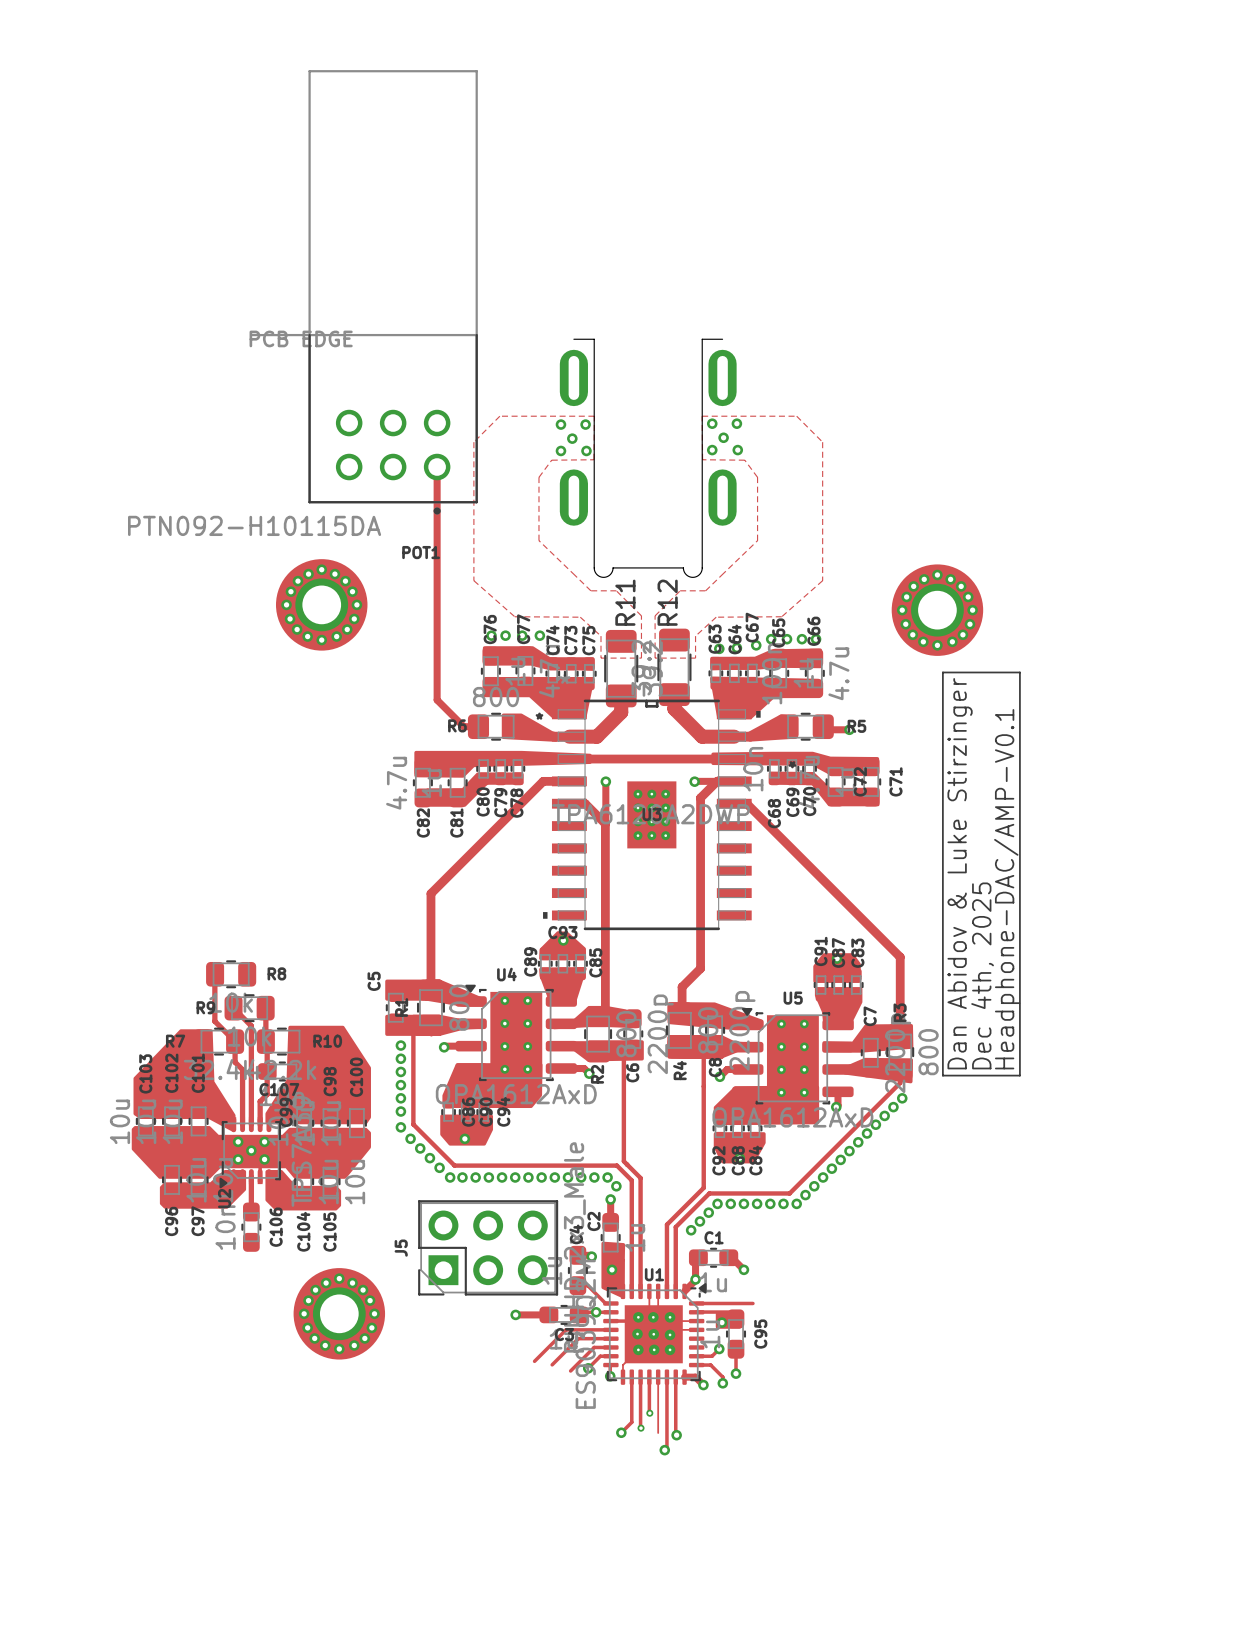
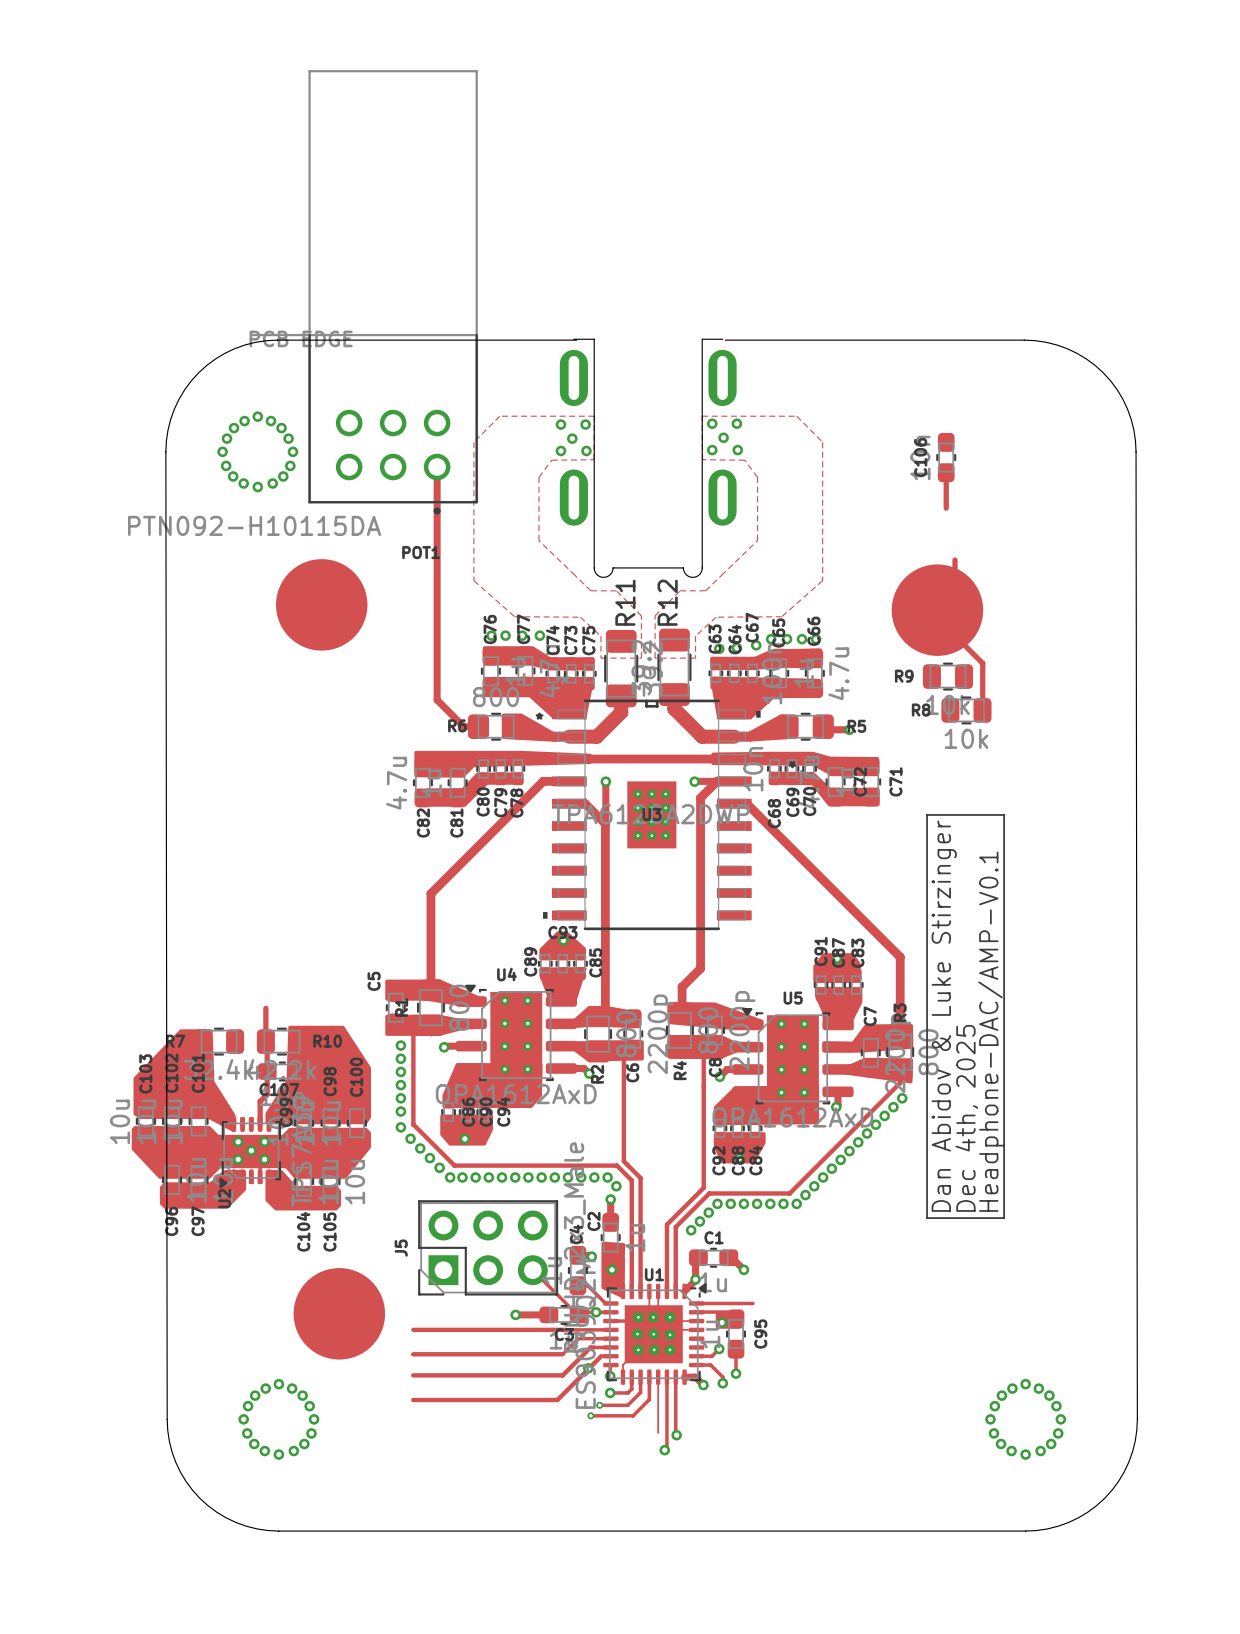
board edge: none -> (576, 340) (277, 340) (255, 342) (224, 353) (206, 365) (184, 389) (170, 419) (165, 451) (167, 1419) (169, 1441) (175, 1462) (192, 1490) (216, 1512) (246, 1526) (267, 1530) (1025, 1531) (1058, 1526) (1087, 1512) (1112, 1490) (1128, 1462) (1136, 1430) (1136, 451) (1131, 419) (1117, 389) (1095, 365) (1076, 353) (1046, 342) (1024, 340) (725, 340)
via: none -> (257, 416)
via: none -> (244, 421)
via: none -> (270, 421)
via: none -> (234, 428)
via: none -> (281, 428)
via: none -> (227, 438)
via: none -> (288, 438)
via: none -> (222, 451)
via: none -> (292, 451)
via: none -> (226, 465)
via: none -> (290, 465)
track: none -> (946, 472) (946, 508)
via: none -> (233, 476)
via: none -> (283, 476)
via: none -> (243, 483)
via: none -> (272, 483)
via: none -> (257, 487)
track: none -> (955, 560) (955, 615) (962, 622) (962, 643) (982, 663) (982, 709)
via: (321, 569) -> none
via: (308, 574) -> none
via: (334, 574) -> none
via: (937, 574) -> none
via: (924, 579) -> none
via: (950, 579) -> none
via: (297, 581) -> none
via: (345, 581) -> none
via: (913, 586) -> none
via: (961, 586) -> none
via: (290, 591) -> none
via: (352, 591) -> none
via: (906, 596) -> none
via: (968, 596) -> none
via: (286, 604) -> none
via: (321, 604) -> none
via: (356, 604) -> none
via: (902, 610) -> none
via: (937, 610) -> none
via: (972, 610) -> none
via: (290, 618) -> none
via: (354, 618) -> none
via: (905, 624) -> none
via: (969, 624) -> none
via: (297, 629) -> none
via: (347, 629) -> none
via: (912, 634) -> none
via: (962, 634) -> none
via: (307, 636) -> none
via: (336, 636) -> none
via: (321, 640) -> none
via: (923, 641) -> none
via: (952, 641) -> none
via: (937, 645) -> none
line: (942, 672) (1019, 672) (1019, 1075) (942, 1075) (942, 672) -> (927, 814) (1004, 814) (1004, 1218) (927, 1218) (927, 814)
text position: Dan Abidov & Luke Stirzinger (960, 873) -> Dan Abidov & Luke Stirzinger (944, 1016)
text position: Headphone-DAC/AMP-V0.1 (1007, 889) -> Headphone-DAC/AMP-V0.1 (991, 1031)
R8 name position: R8 (276, 973) -> R8 (921, 710)
R8 position: (231, 974) -> (966, 710)
track: (214, 975) (214, 1021) (235, 1041) (235, 1062) (242, 1069) (242, 1124) -> none
text position: Dec 4th, 2025 (982, 975) -> Dec 4th, 2025 (966, 1118)
track: (233, 1008) (251, 1025) (251, 1124) -> none
R9 position: (249, 1008) -> (947, 676)
track: (251, 1176) (251, 1212) -> none
C106 position: (251, 1227) -> (946, 457)
C106 name position: C106 (276, 1227) -> C106 (920, 457)
track: none -> (532, 1270) (579, 1314)
via: (339, 1278) -> none
via: (326, 1283) -> none
via: (352, 1283) -> none
via: (315, 1290) -> none
via: (363, 1290) -> none
via: (308, 1300) -> none
via: (370, 1300) -> none
via: (304, 1313) -> none
via: (339, 1313) -> none
via: (374, 1313) -> none
via: (307, 1327) -> none
via: (371, 1327) -> none
track: (566, 1329) (534, 1361) -> (566, 1329) (413, 1329)
via: (314, 1338) -> none
via: (364, 1338) -> none
via: (325, 1345) -> none
via: (354, 1345) -> none
track: (594, 1347) (570, 1370) -> (594, 1347) (590, 1347) (562, 1375) (413, 1375)
via: (339, 1349) -> none
track: (562, 1354) (552, 1364) -> (562, 1354) (413, 1354)
track: (601, 1356) (588, 1368) -> (601, 1356) (557, 1400) (413, 1400)
via: none -> (278, 1384)
via: none -> (1025, 1384)
via: none -> (265, 1388)
via: none -> (292, 1388)
via: none -> (1012, 1388)
via: none -> (1038, 1388)
track: (631, 1389) (631, 1422) (621, 1432) -> (631, 1389) (627, 1392) (610, 1392)
track: (640, 1392) (640, 1427) -> (640, 1392) (627, 1405) (599, 1405)
via: none -> (255, 1395)
via: none -> (302, 1395)
via: none -> (1001, 1395)
via: none -> (1049, 1395)
track: (649, 1399) (649, 1411) -> (649, 1399) (633, 1415) (590, 1415)
via: none -> (599, 1405)
via: none -> (248, 1406)
via: none -> (309, 1406)
via: none -> (994, 1406)
via: none -> (1056, 1406)
via: (649, 1413) -> none
via: none -> (590, 1415)
via: none -> (243, 1419)
via: none -> (314, 1419)
via: none -> (990, 1419)
via: none -> (1060, 1419)
via: (641, 1428) -> none
via position: (621, 1432) -> (610, 1392)
via: none -> (247, 1433)
via: none -> (311, 1433)
via: none -> (993, 1433)
via: none -> (1058, 1433)
via: none -> (254, 1443)
via: none -> (304, 1443)
via: none -> (1001, 1443)
via: none -> (1051, 1443)
via: none -> (264, 1451)
via: none -> (293, 1451)
via: none -> (1011, 1451)
via: none -> (1040, 1451)
via: none -> (278, 1454)
via: none -> (1025, 1454)

